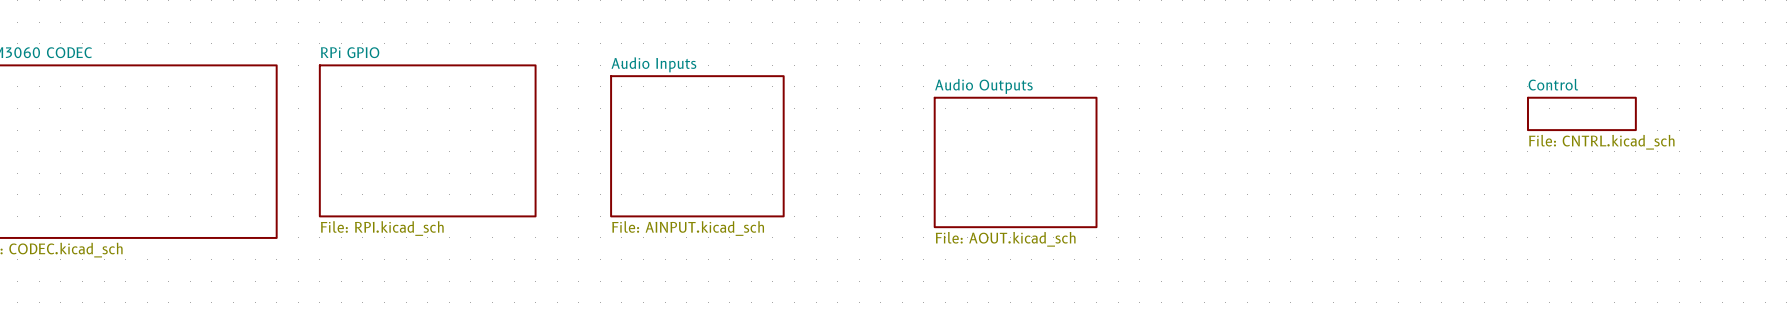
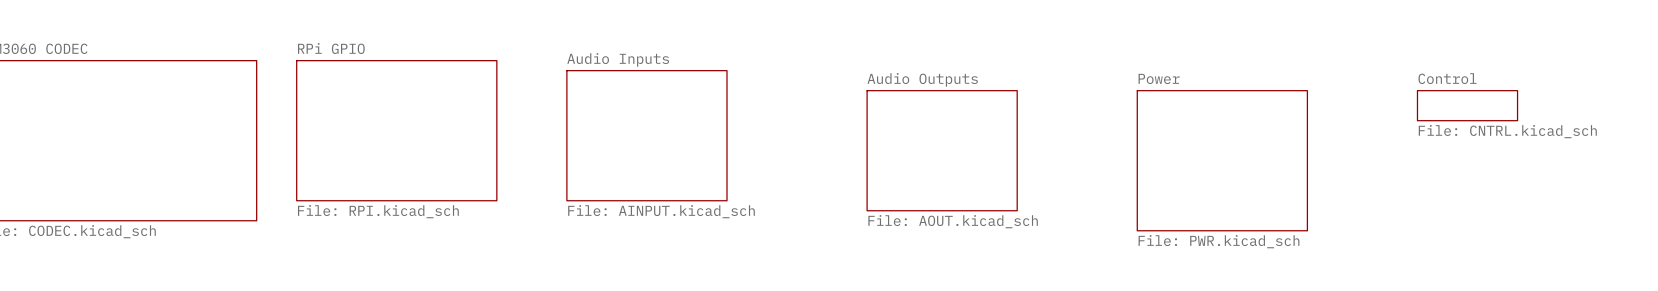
sheet Power: none -> File: PWR.kicad_sch (1222, 160)

